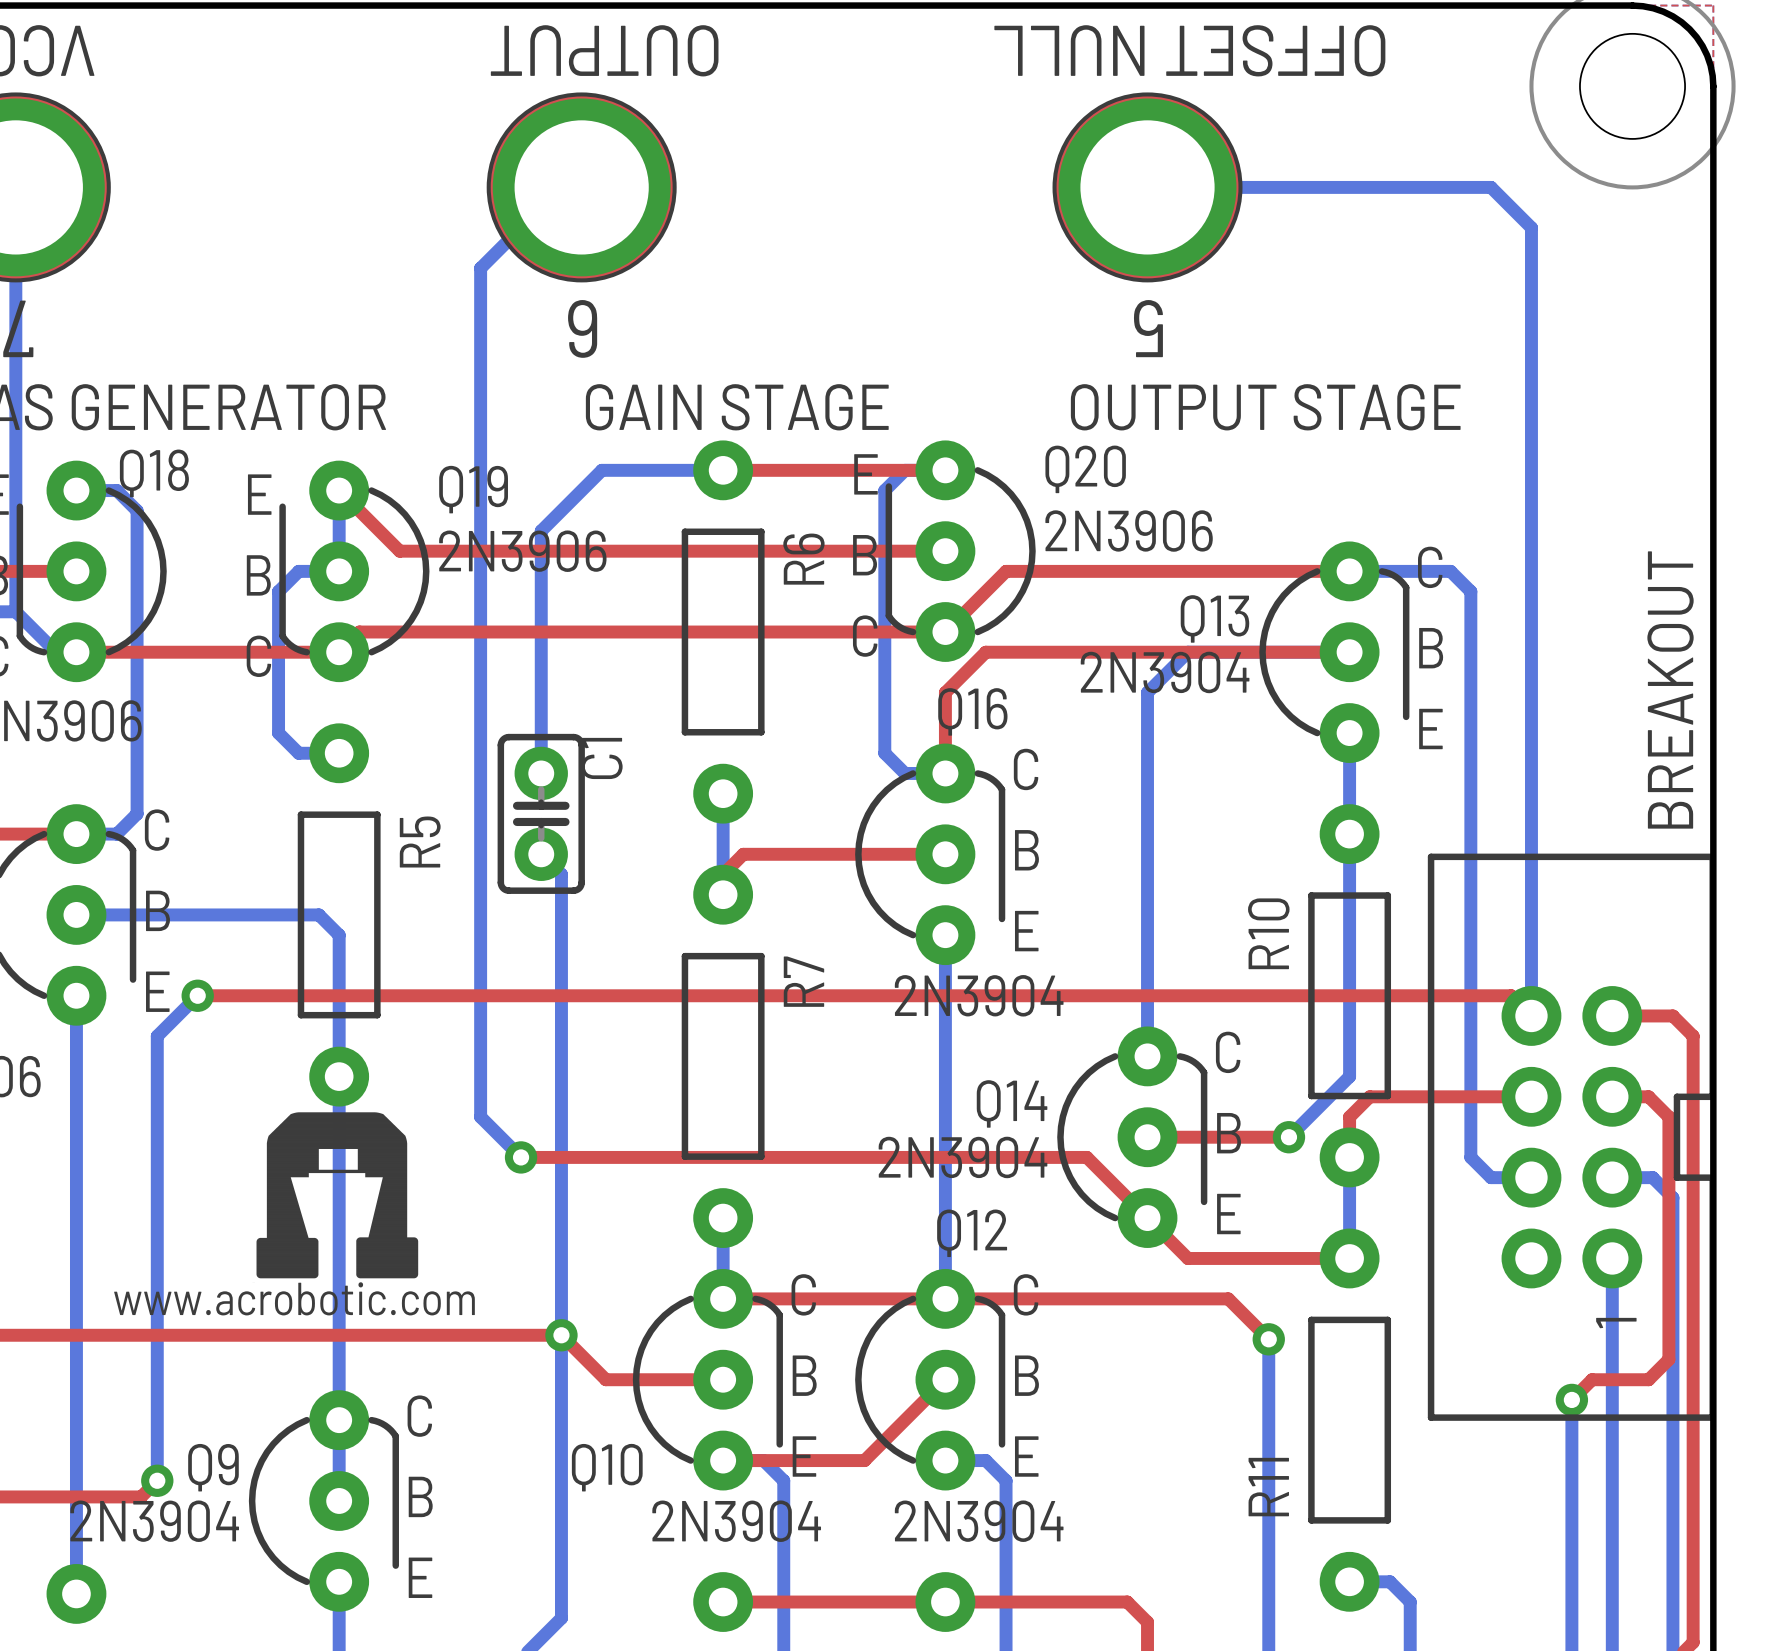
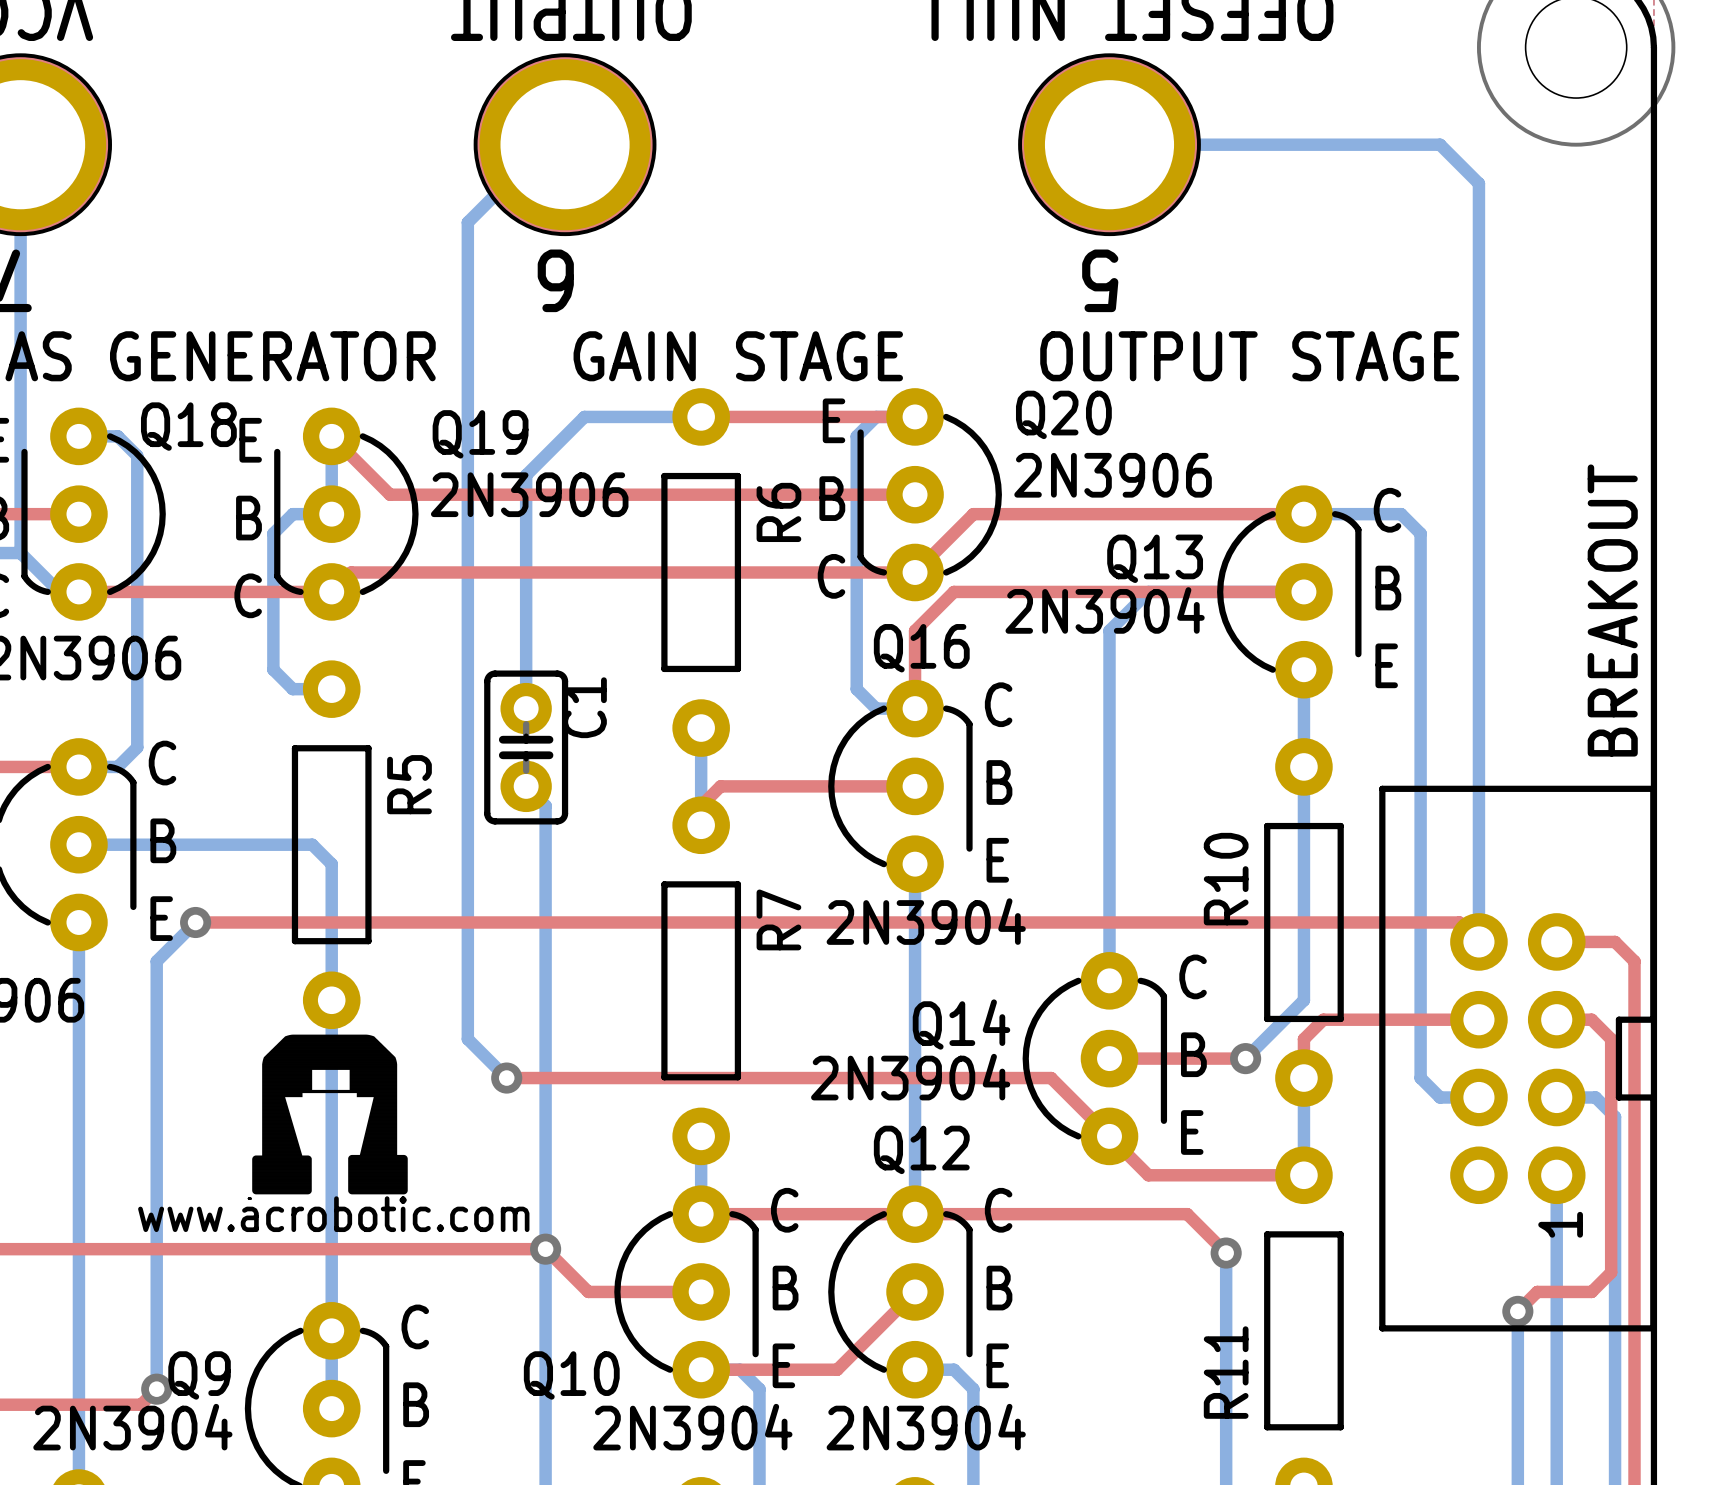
Q18 name position: Q18 (154, 473) -> Q18 (188, 426)
text position: www.acrobotic.com (294, 1298) -> www.acrobotic.com (333, 1214)

